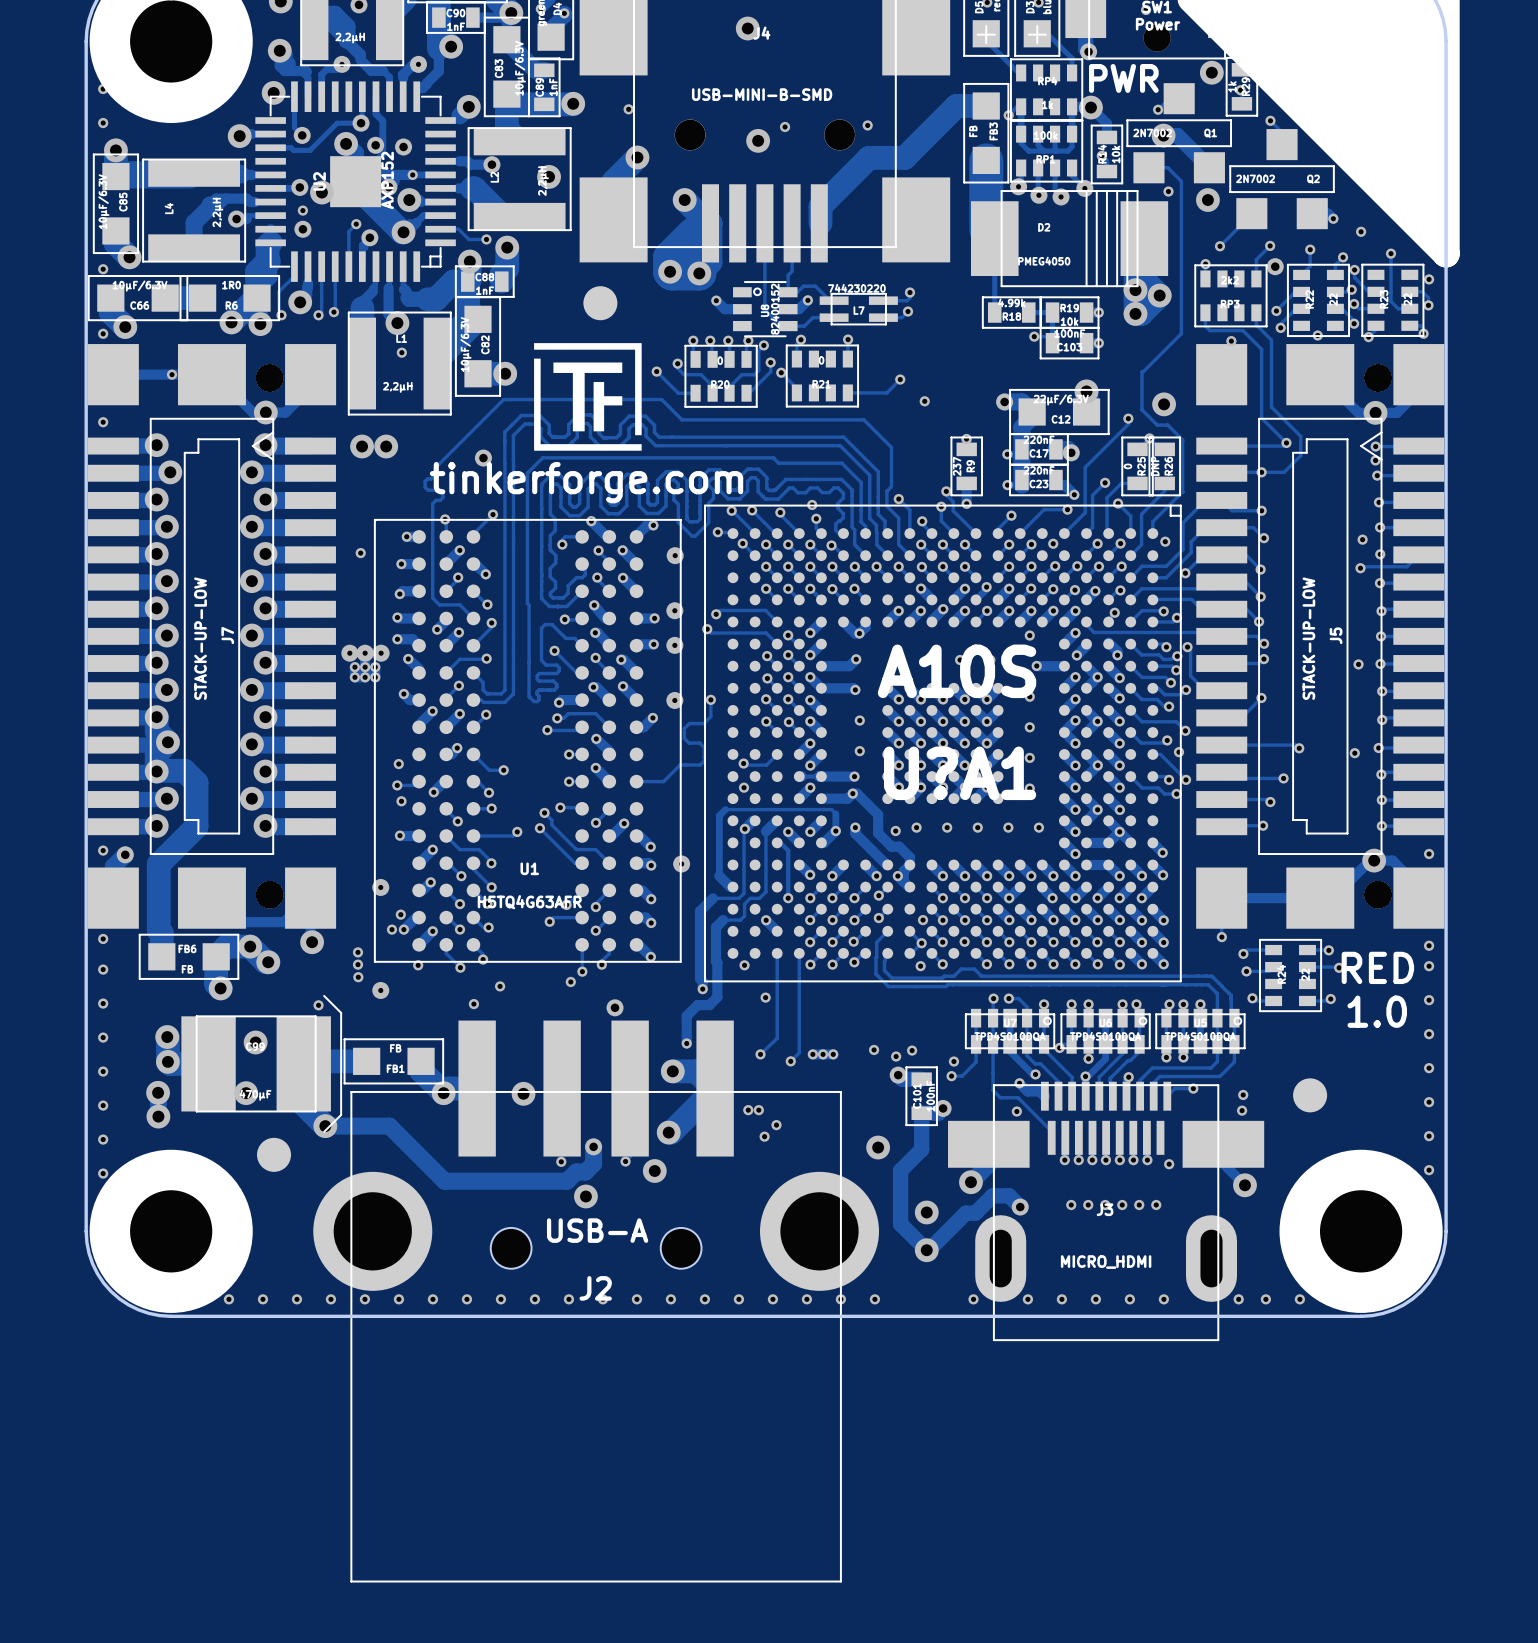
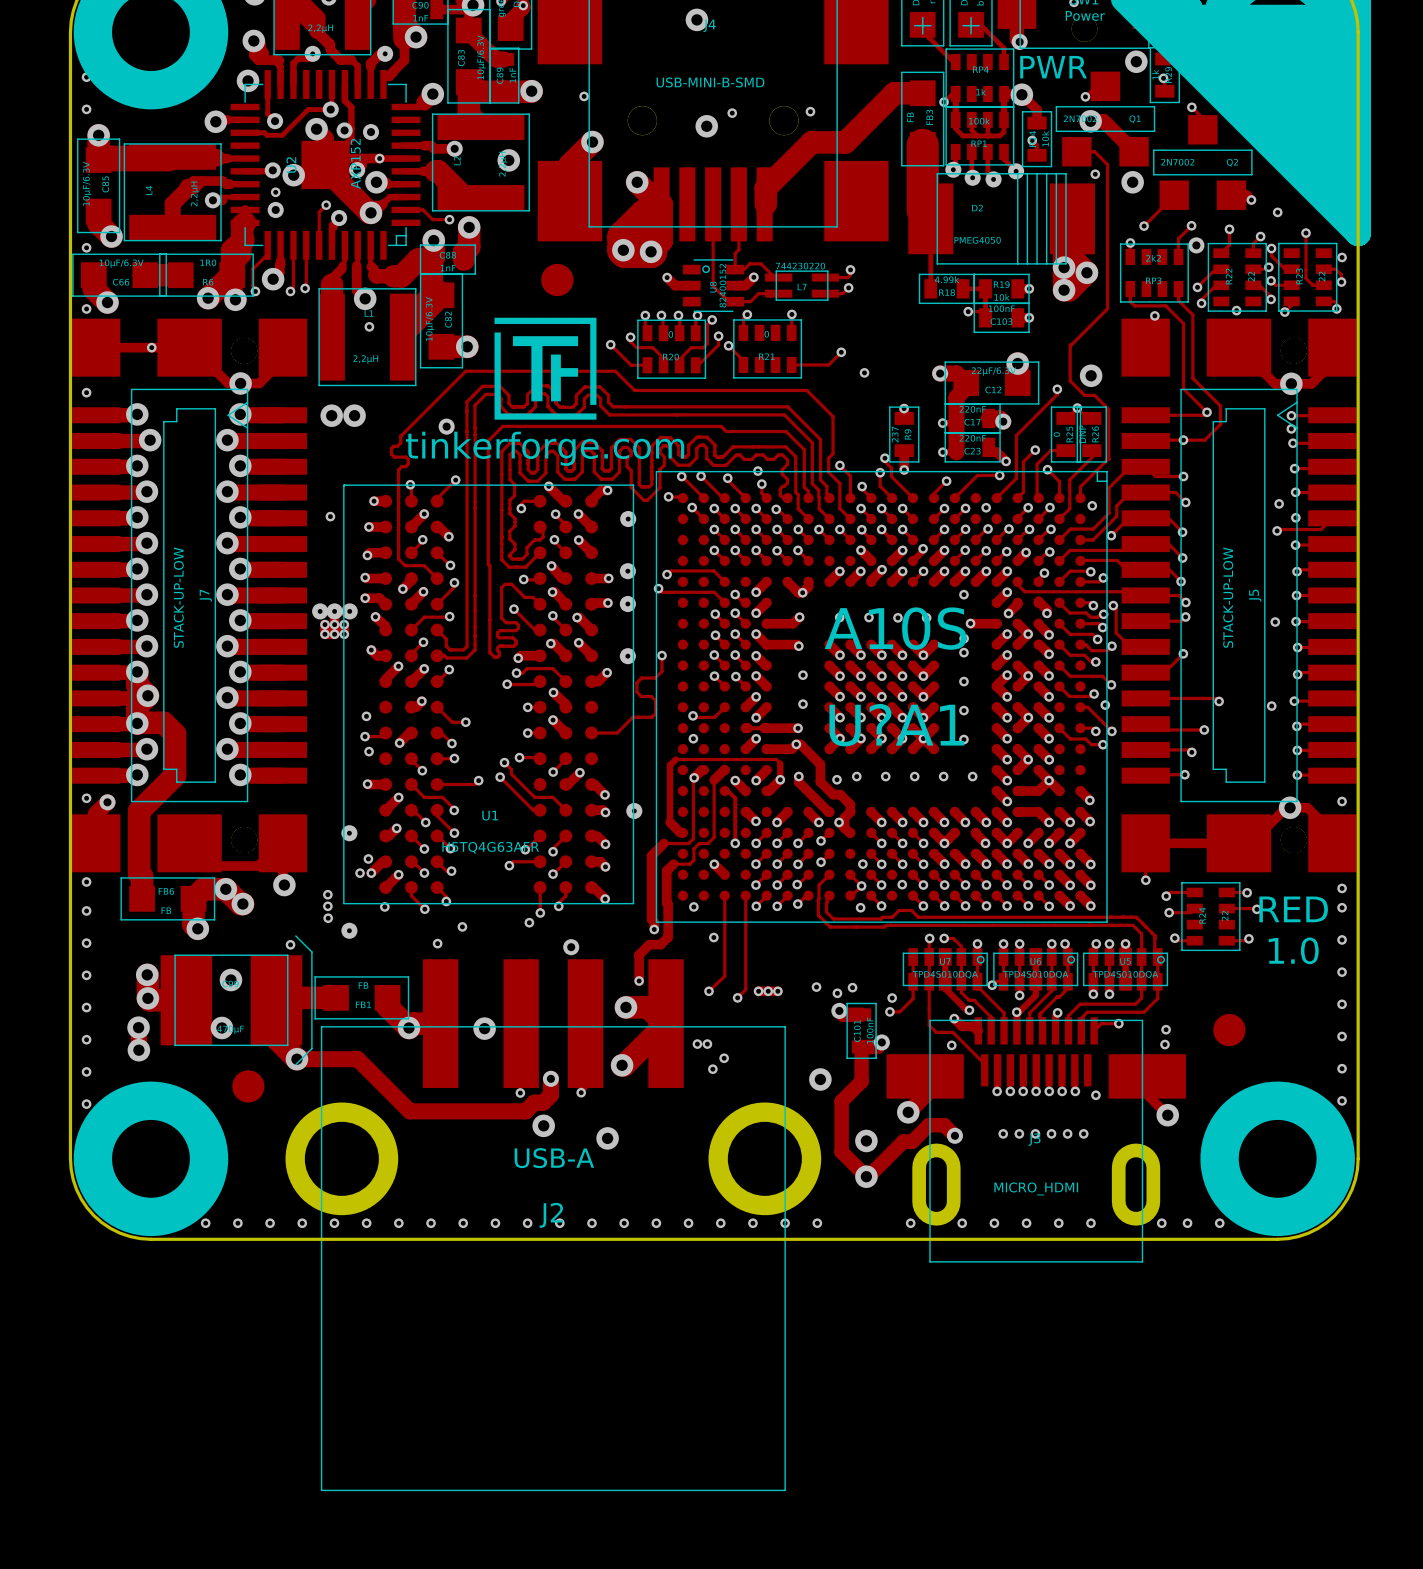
J2 footprint: [313, 1020, 880, 1582] -> [285, 959, 822, 1491]
via position: (654, 1171) -> (607, 1138)

